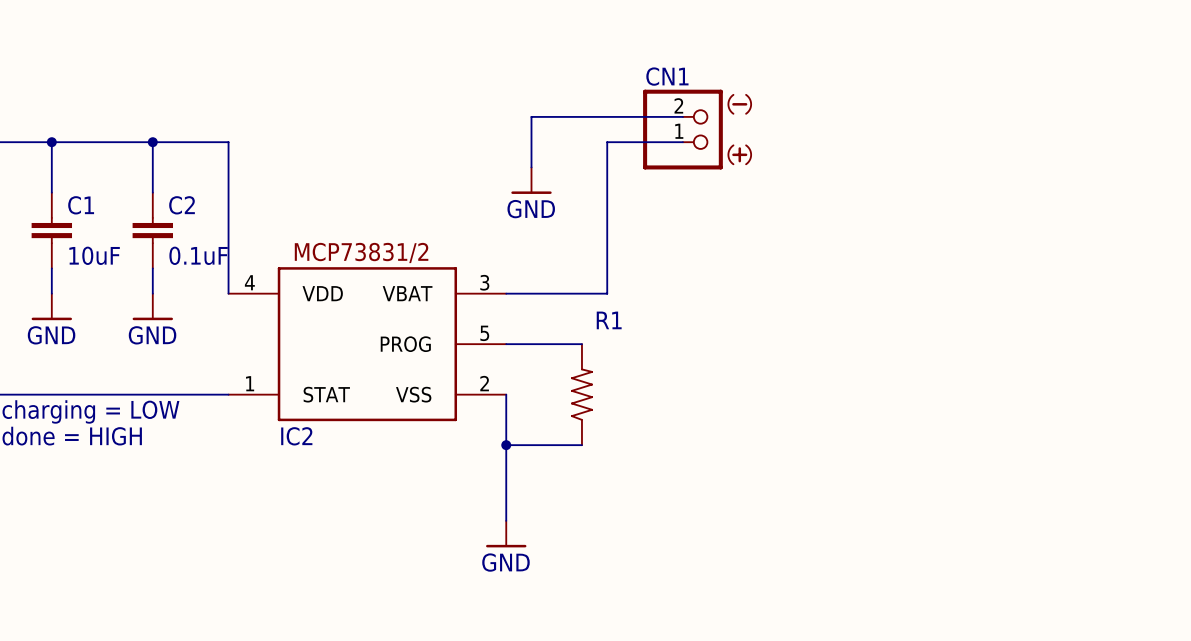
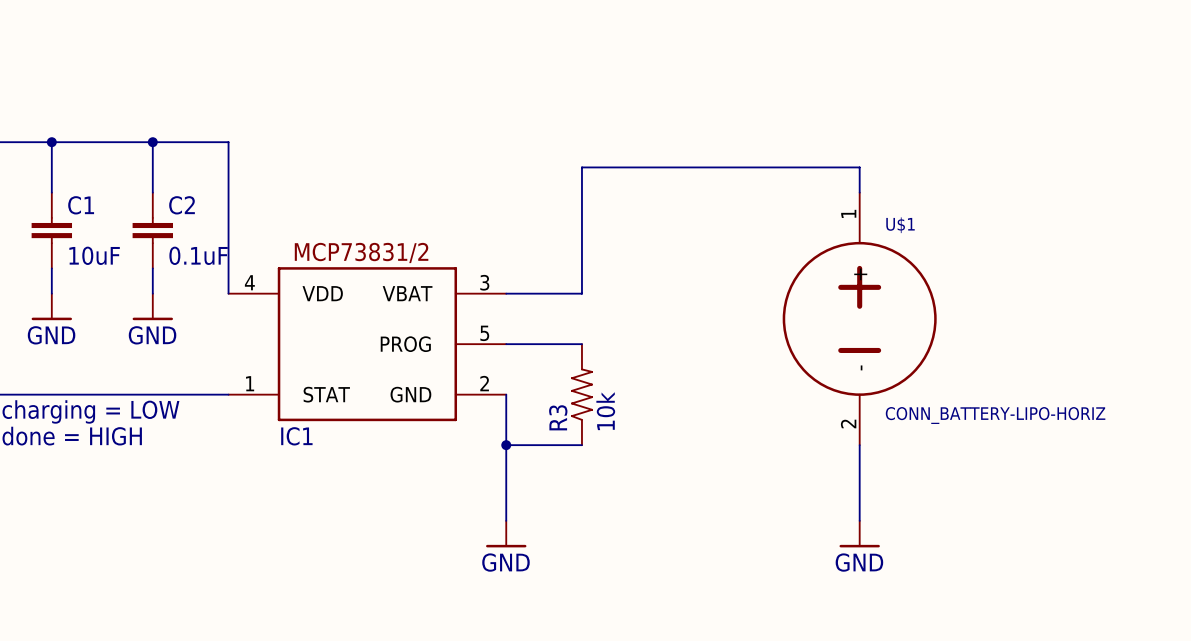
wire: (682, 116) (531, 116) (531, 167) -> none
CN1: (697, 129) -> none
wire: (682, 142) (607, 142) (607, 293) (581, 293) -> (859, 192) (859, 167) (581, 167) (581, 293)
power symbol: GND (531, 180) -> none
U$1: none -> CONN_BATTERY-LIPO-HORIZ (859, 318)
R1 name: R1 (609, 320) -> R3 (558, 417)
IC2 pin name: VSS (413, 394) -> GND (410, 394)
R1 value: none -> 10k (605, 411)
IC2 name: IC2 (296, 436) -> IC1 (296, 436)
wire: none -> (859, 445) (859, 520)
power symbol: none -> GND (859, 534)

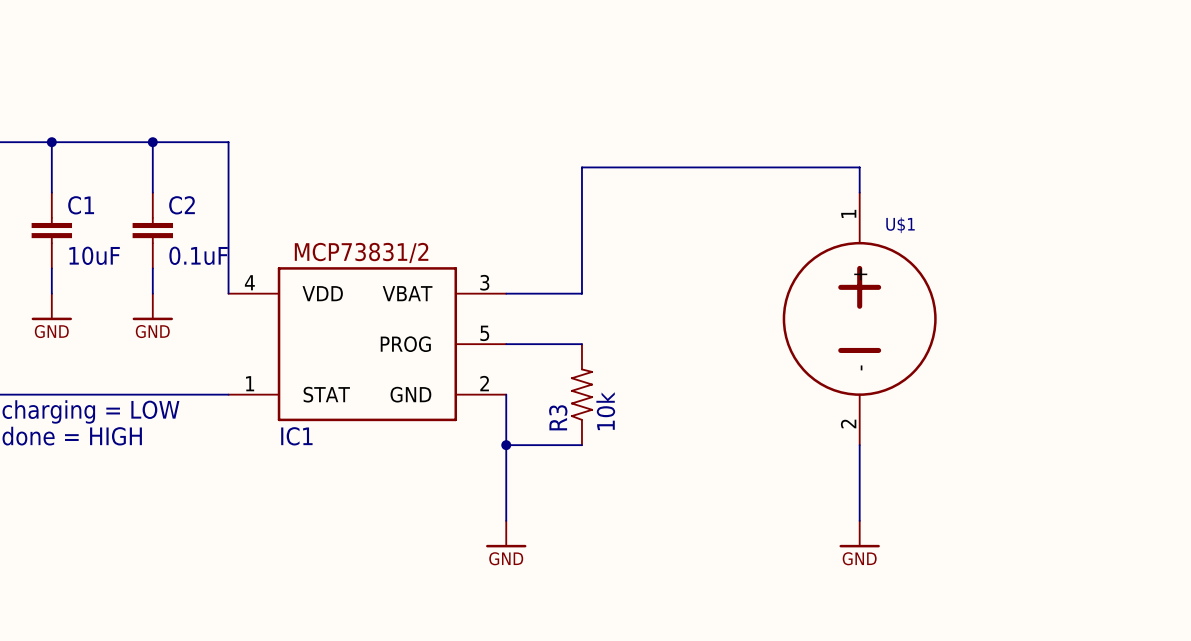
power symbol text: none -> GND (51, 331)
power symbol text: none -> GND (152, 331)
power symbol text: GND (51, 335) -> none
power symbol text: GND (152, 335) -> none
U$1 value: CONN_BATTERY-LIPO-HORIZ (995, 415) -> none
power symbol text: none -> GND (506, 558)
power symbol text: none -> GND (859, 558)
power symbol text: GND (505, 562) -> none
power symbol text: GND (859, 562) -> none

